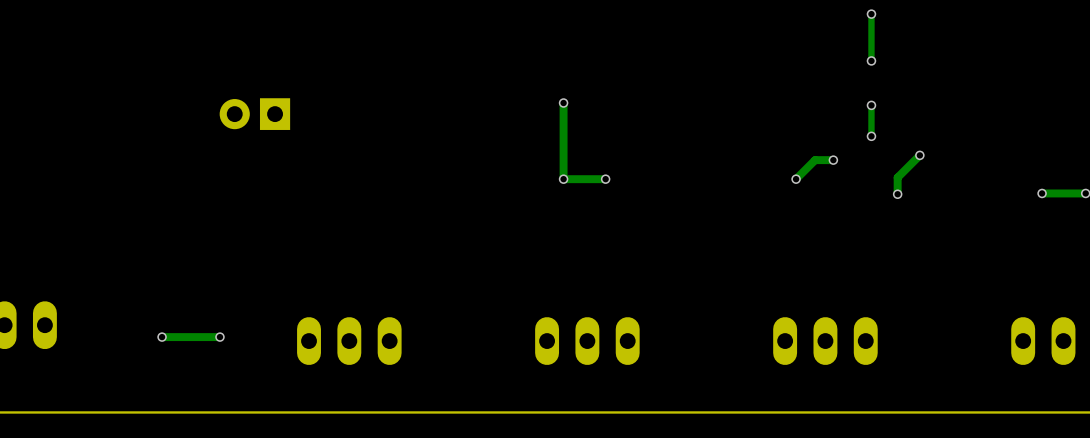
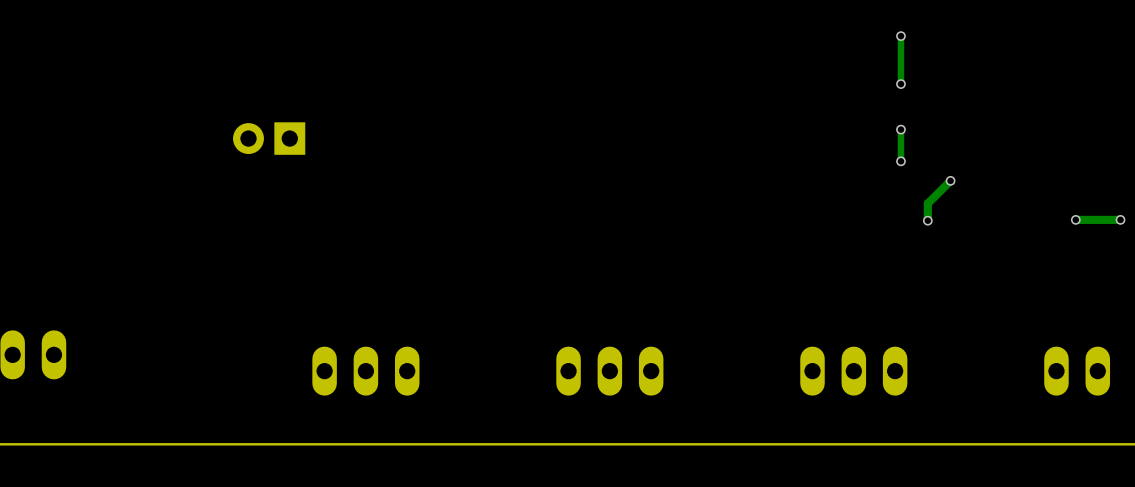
track: (563, 102) (563, 179) (605, 179) -> none
via: (563, 102) -> none
track: (833, 160) (815, 160) (796, 179) -> none
via: (833, 160) -> none
via: (563, 179) -> none
via: (605, 179) -> none
via: (796, 179) -> none
via: (162, 337) -> none
track: (219, 337) (162, 337) -> none
via: (219, 337) -> none

